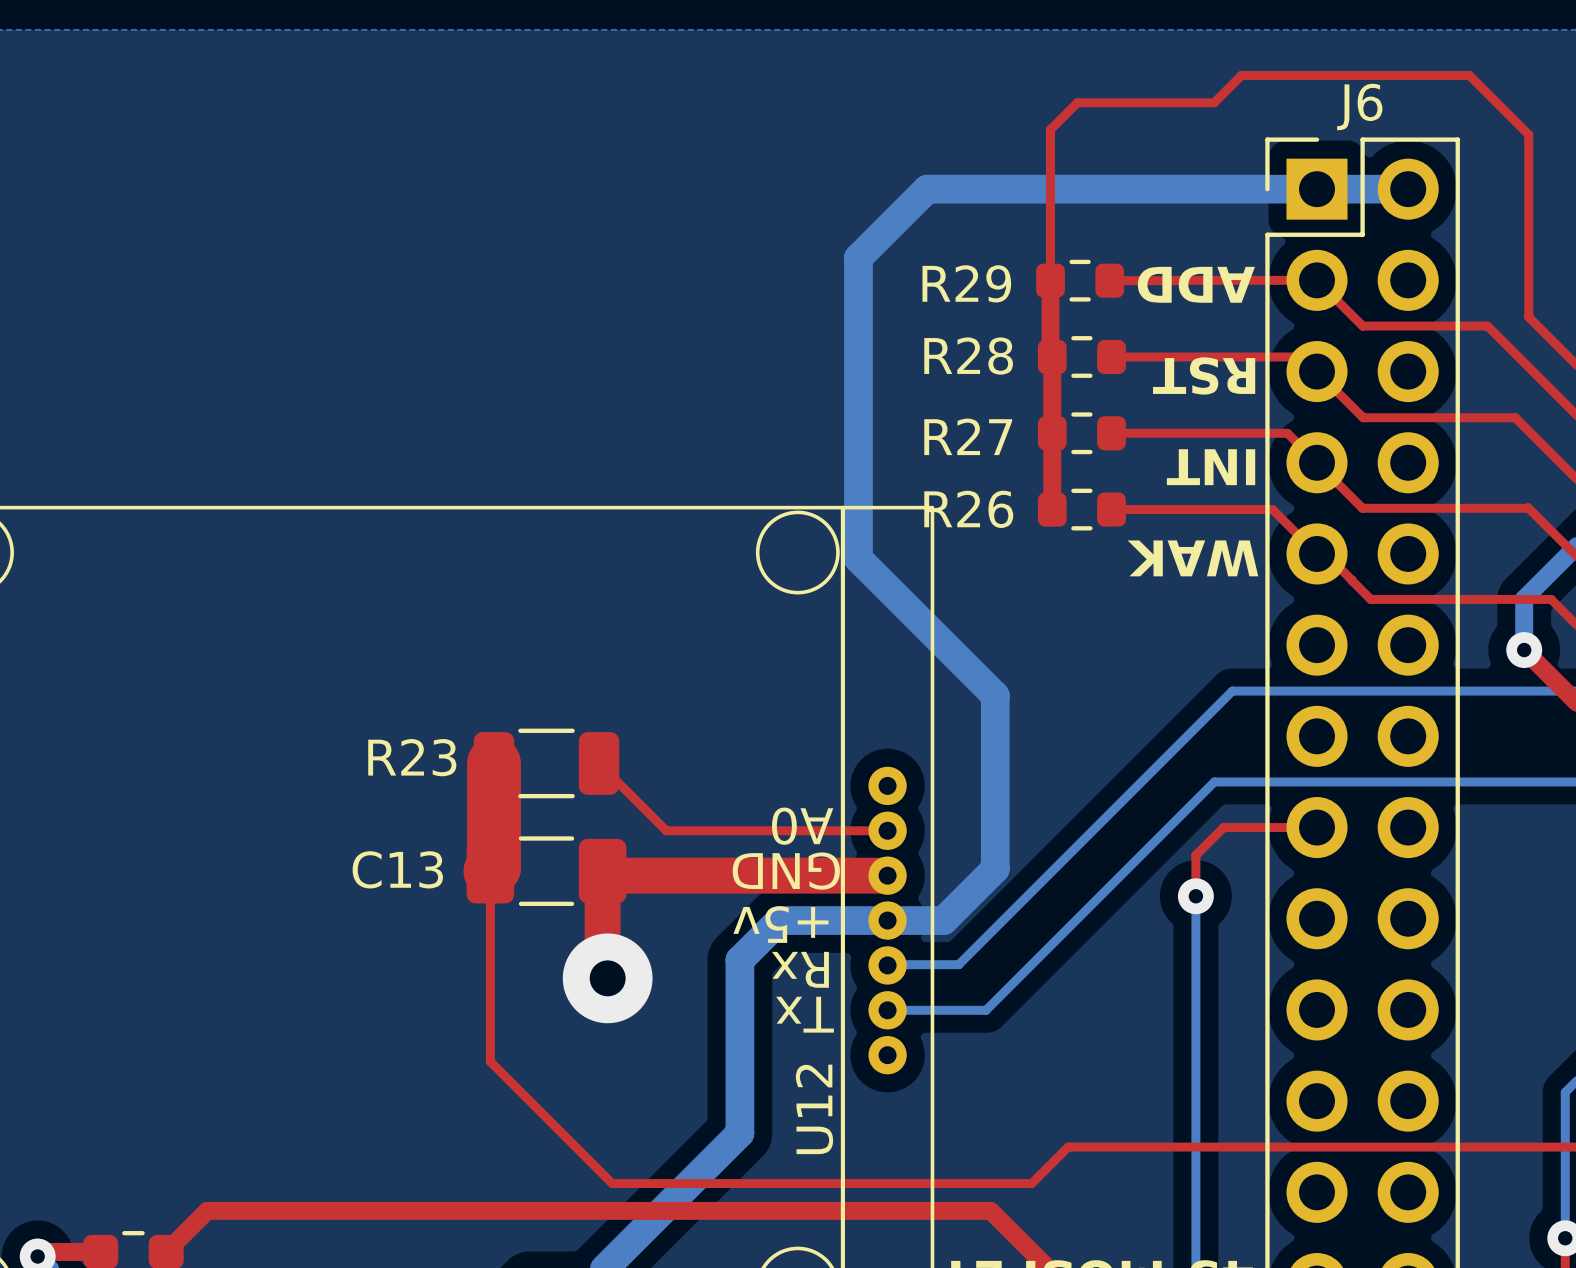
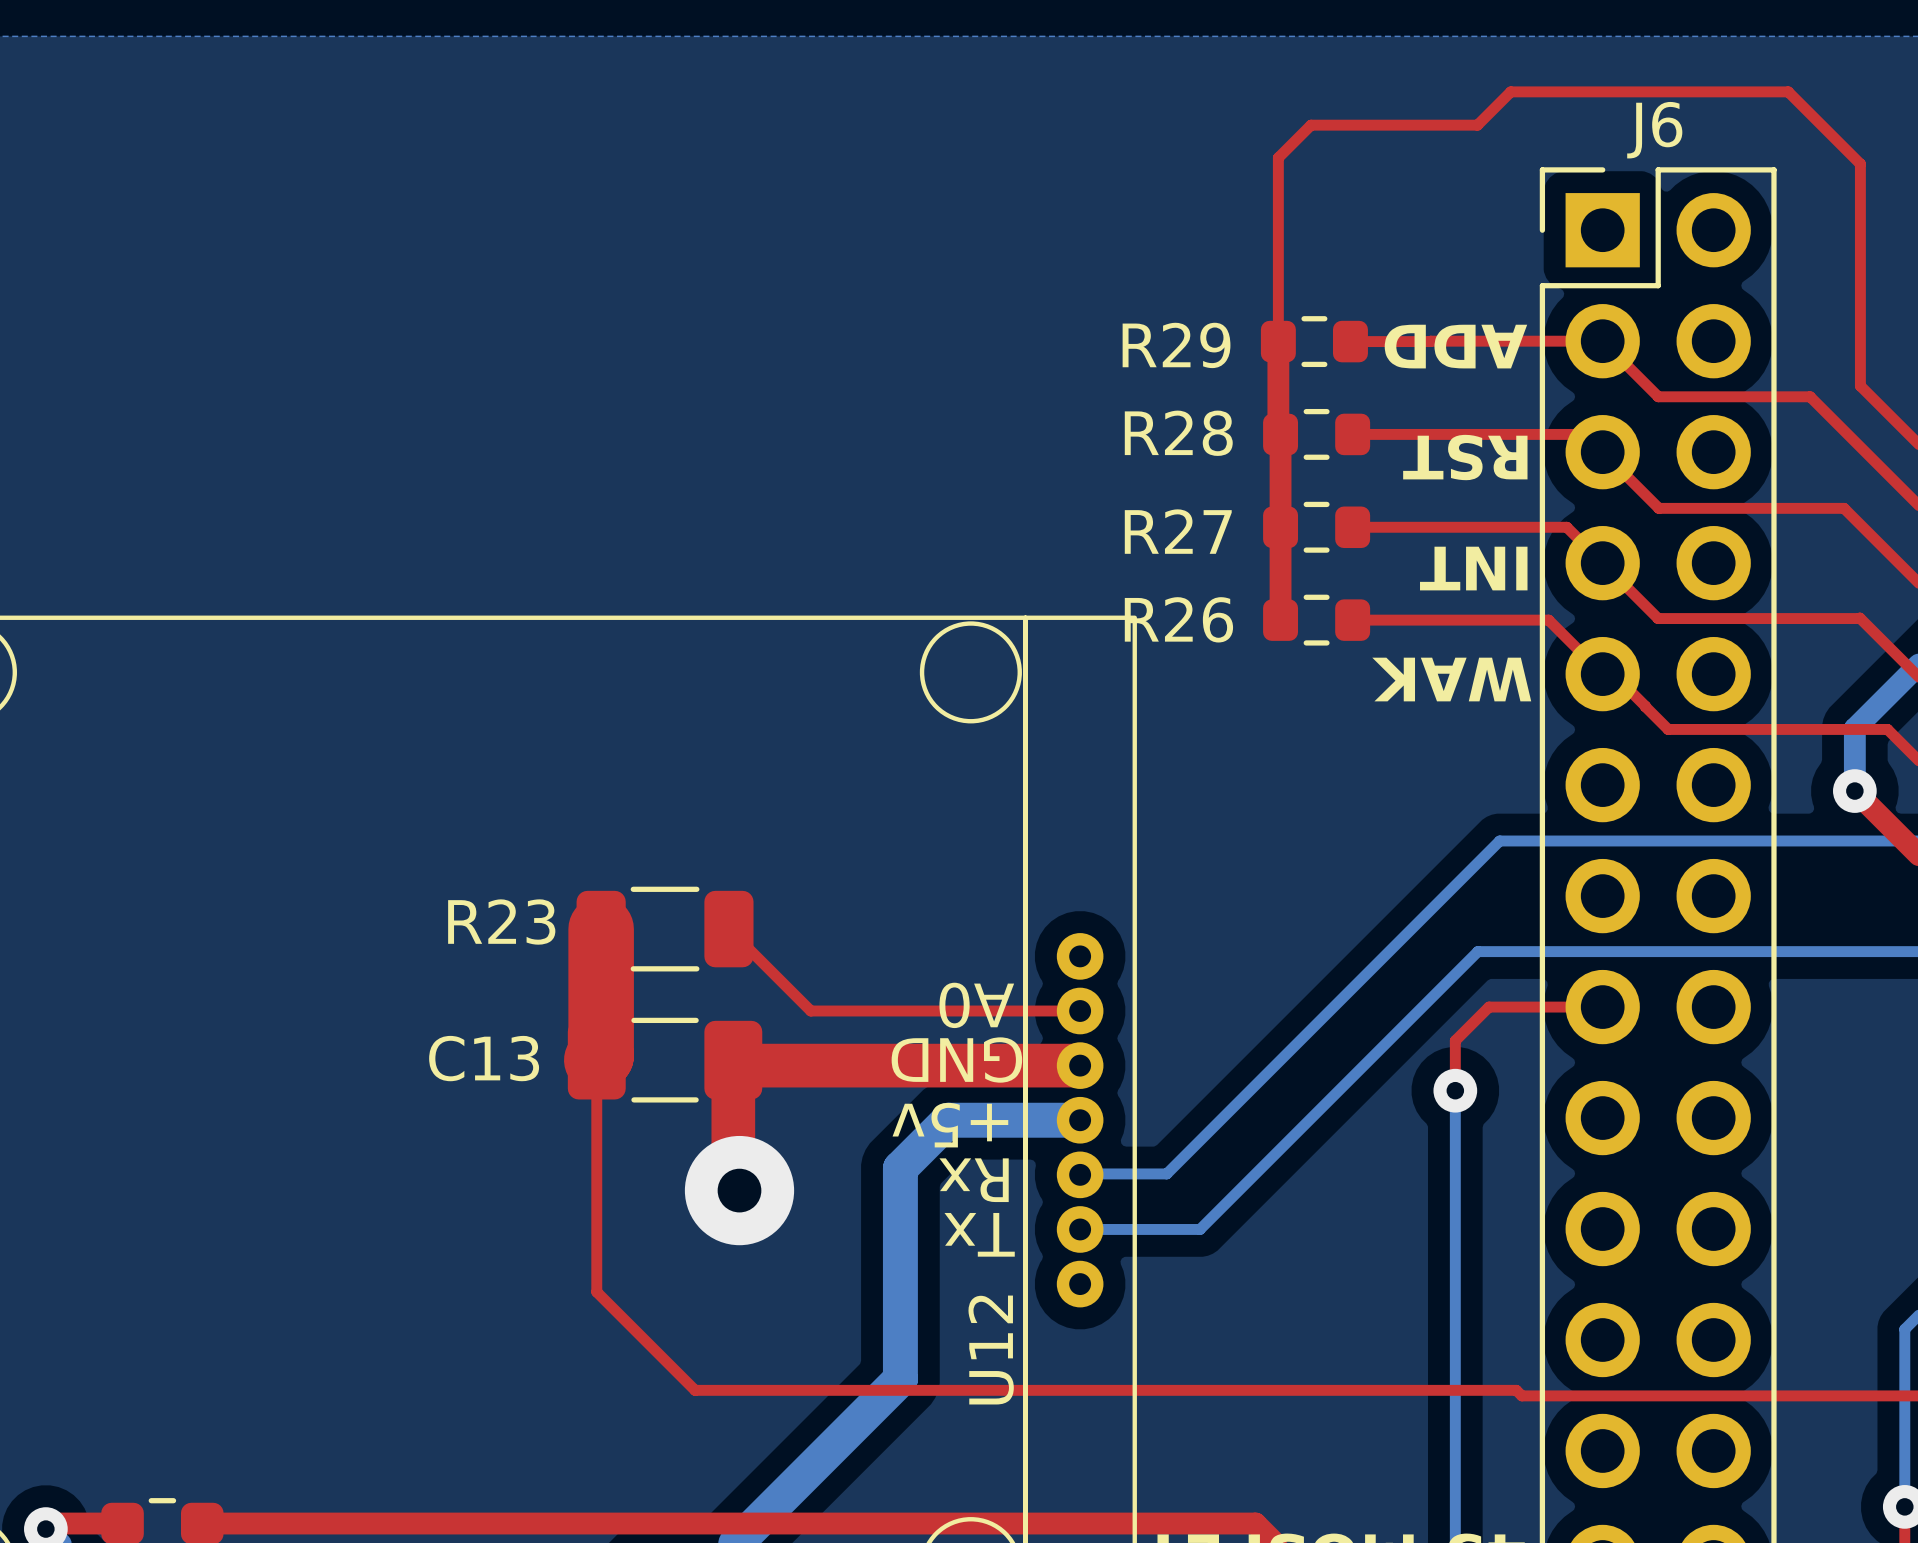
bottom track: (1408, 189) (927, 189) (858, 257) (858, 558) (995, 695) (995, 868) (943, 920) (887, 920) -> none
top track: (571, 1142) (612, 1183) (1031, 1183) (1068, 1147) (1250, 1147) -> (695, 1390) (1516, 1390) (1521, 1395)
top track: (166, 1251) (207, 1210) (990, 1210) (1031, 1251) -> (202, 1523) (1255, 1523)

